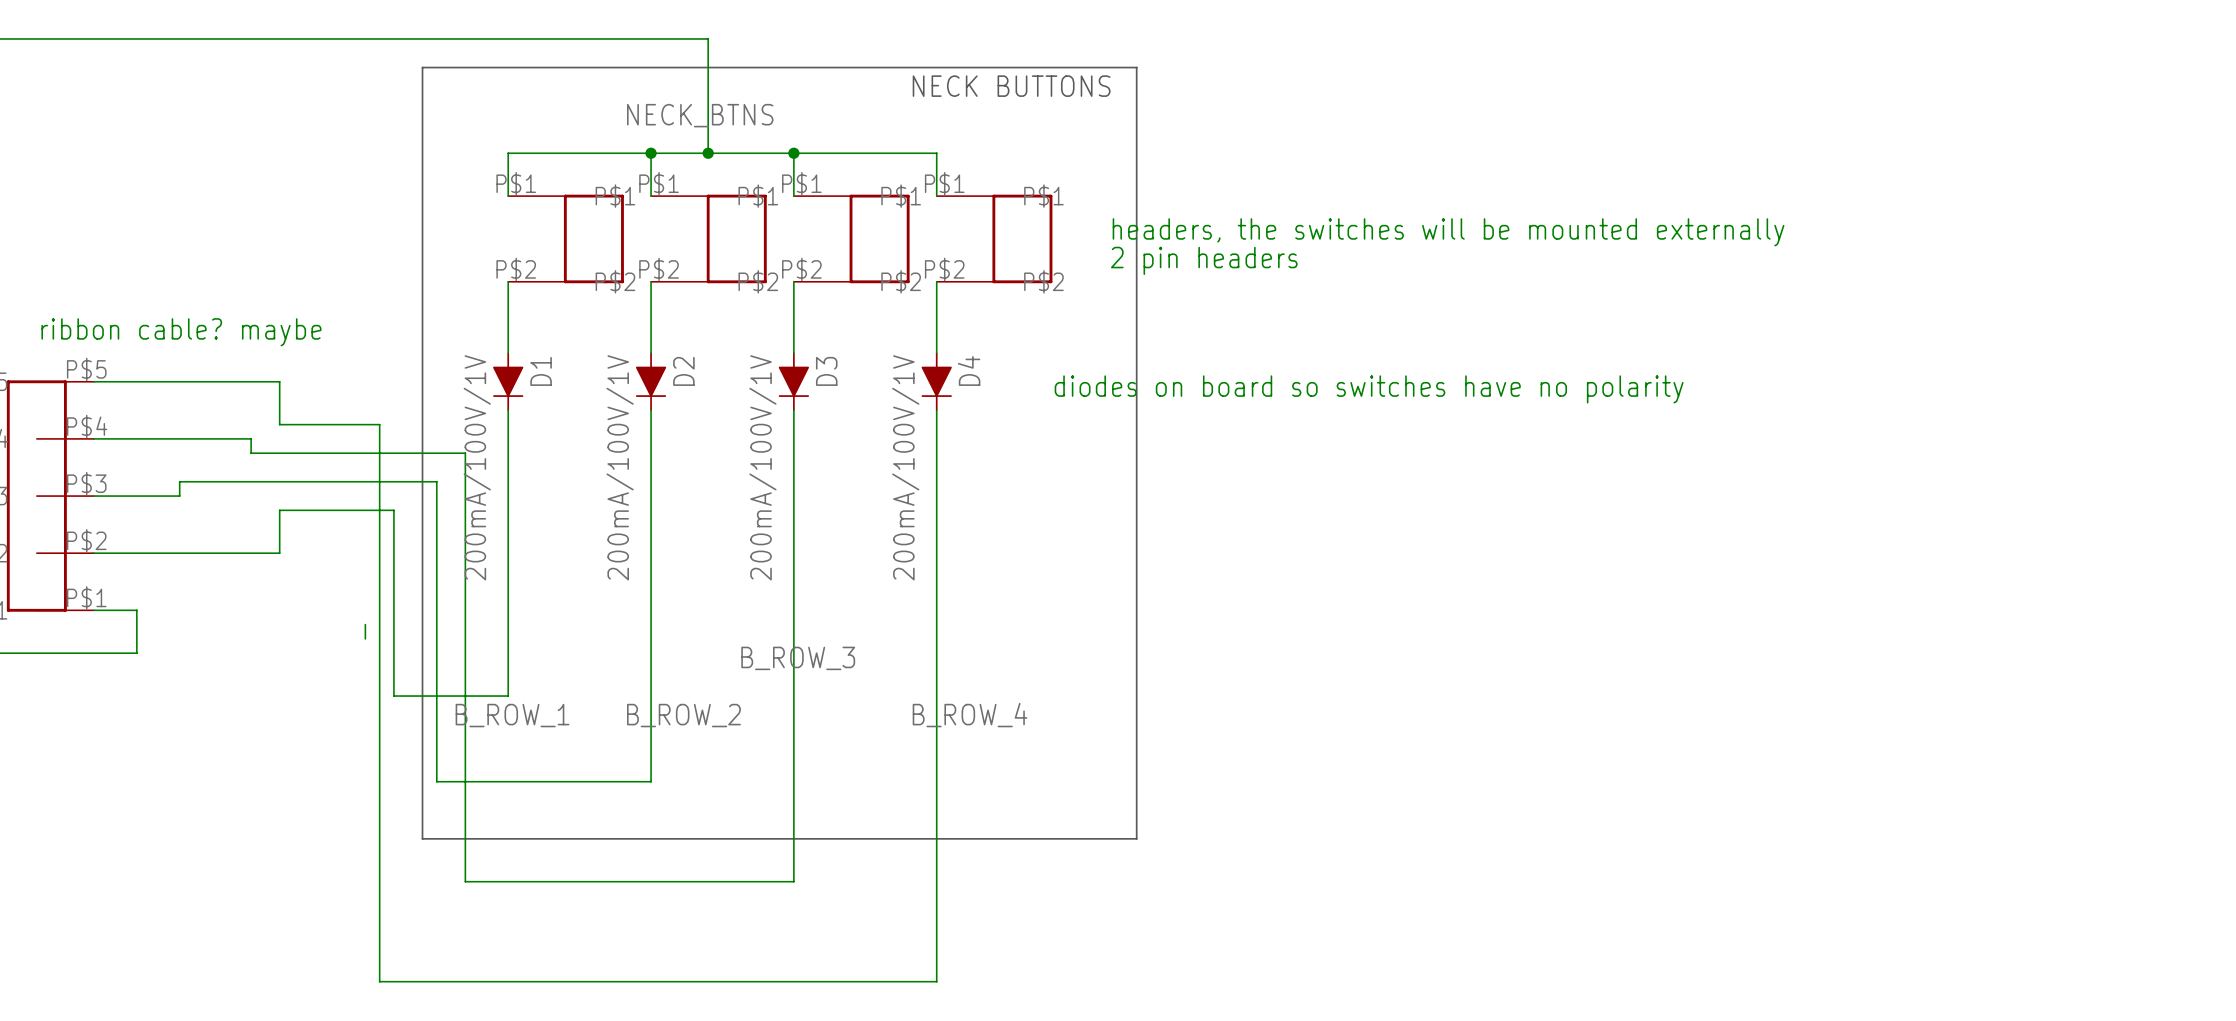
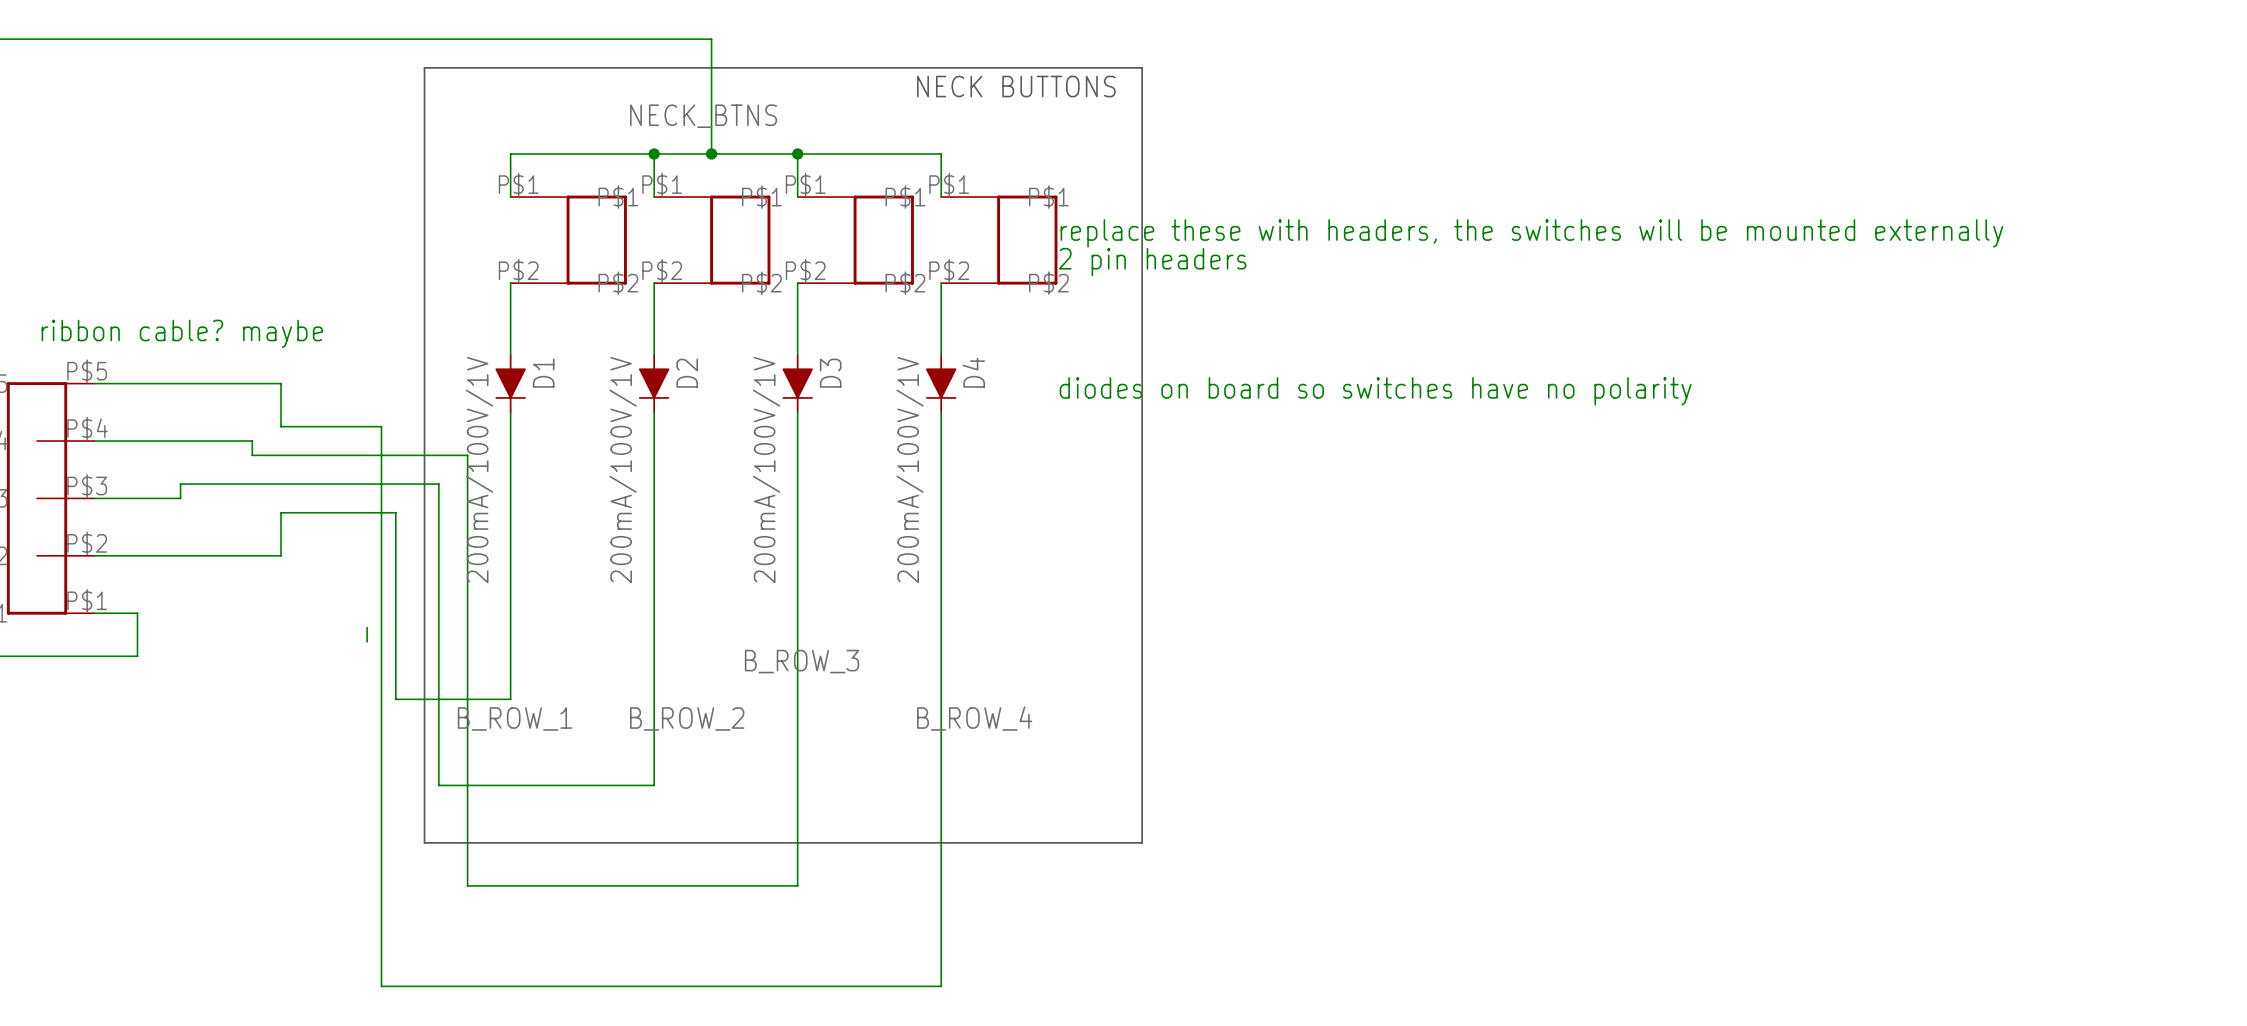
text: headers, the switches will be mounted externally (1448, 232) -> replace these with headers, the switches will be mounted externally (1531, 233)
text position: 2 pin headers (1204, 260) -> 2 pin headers (1152, 262)

